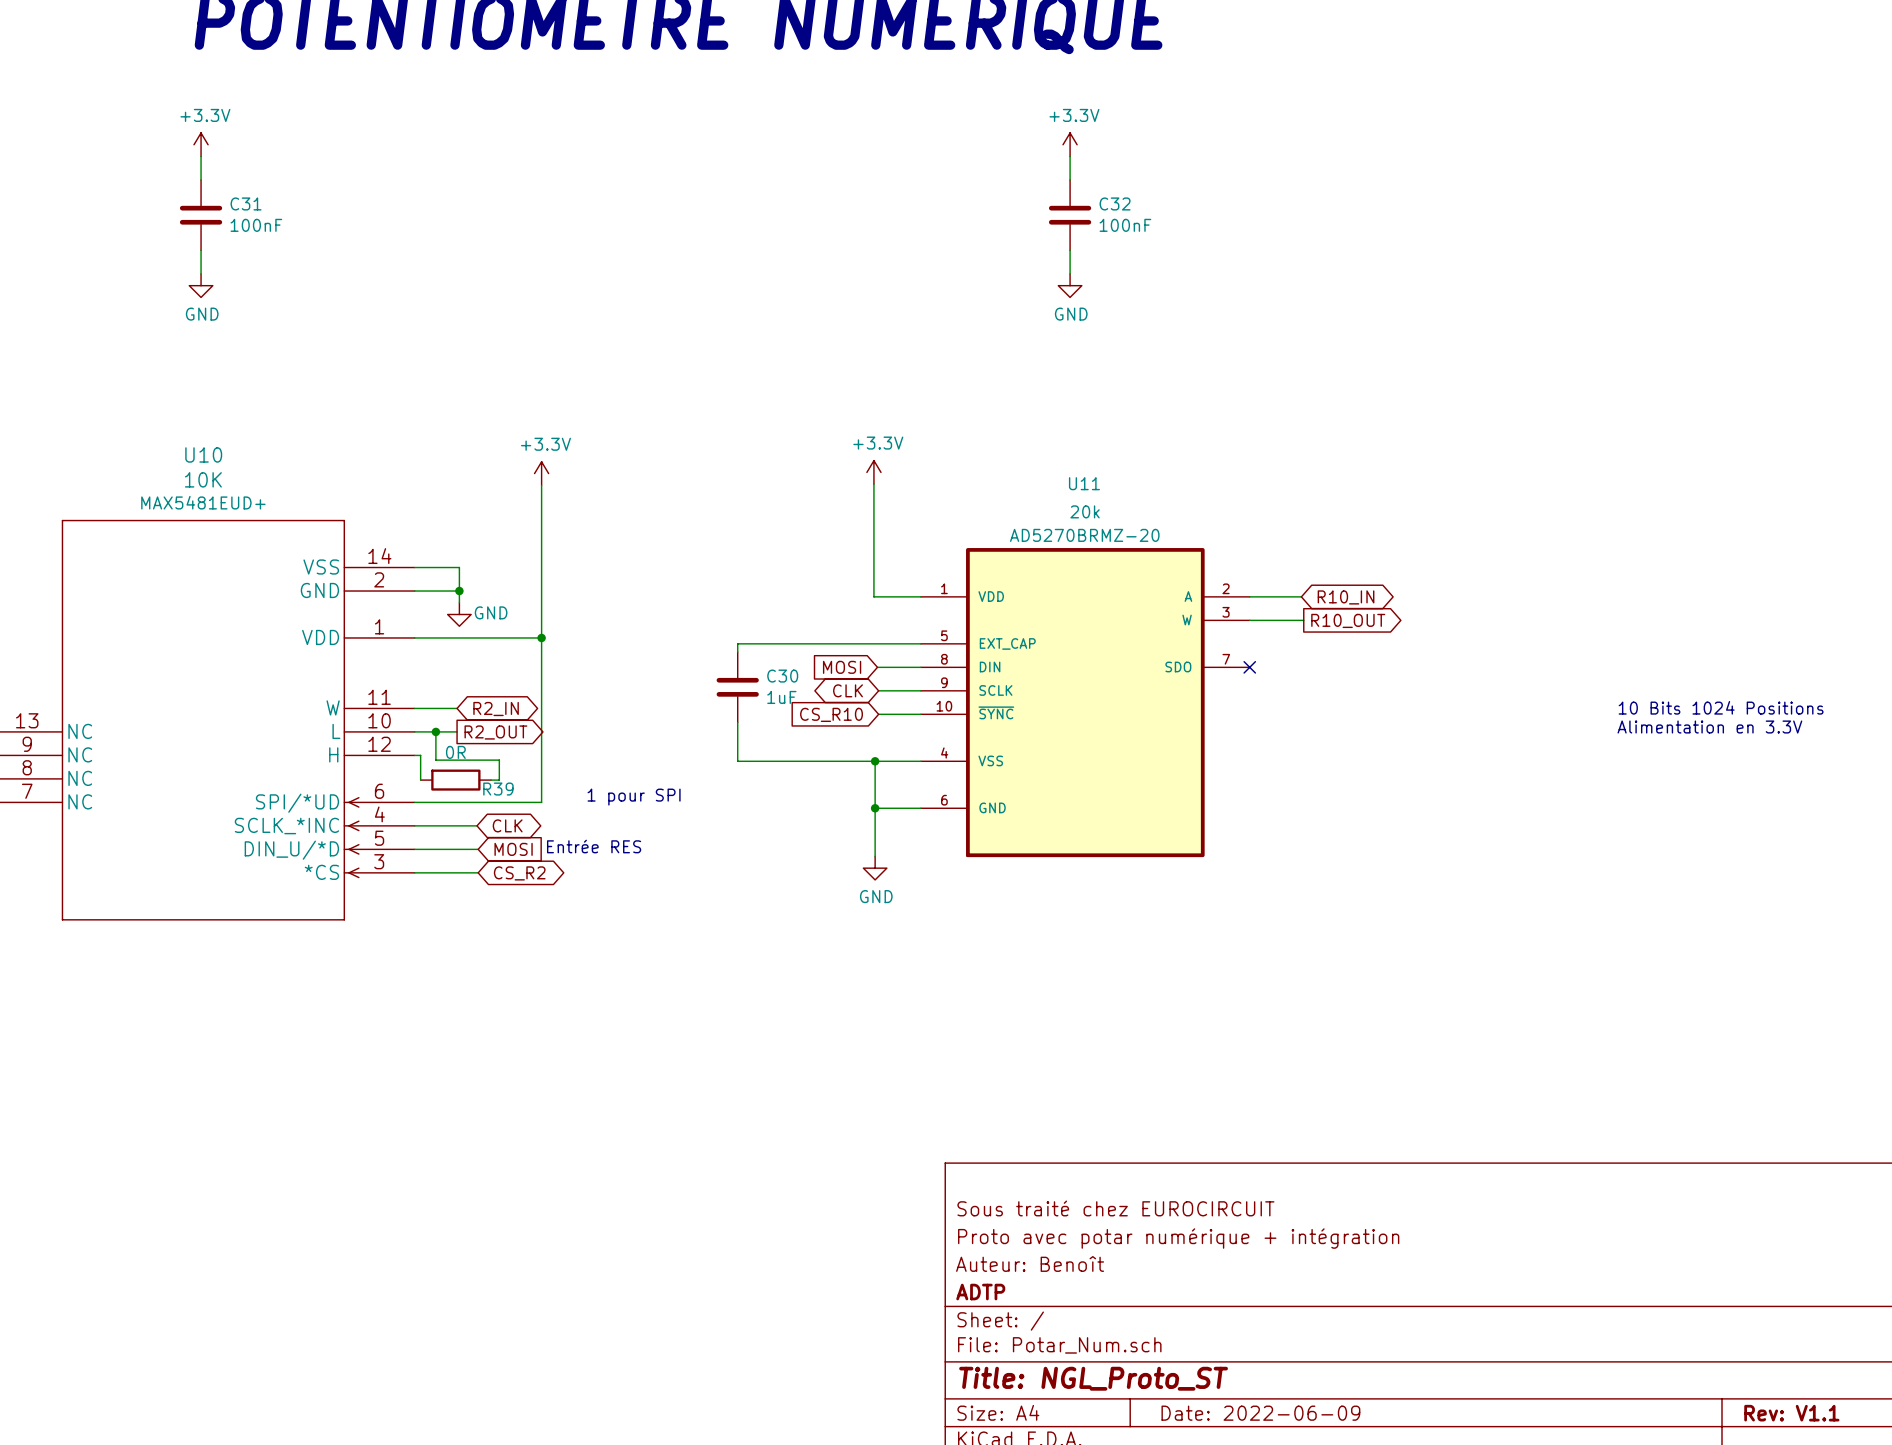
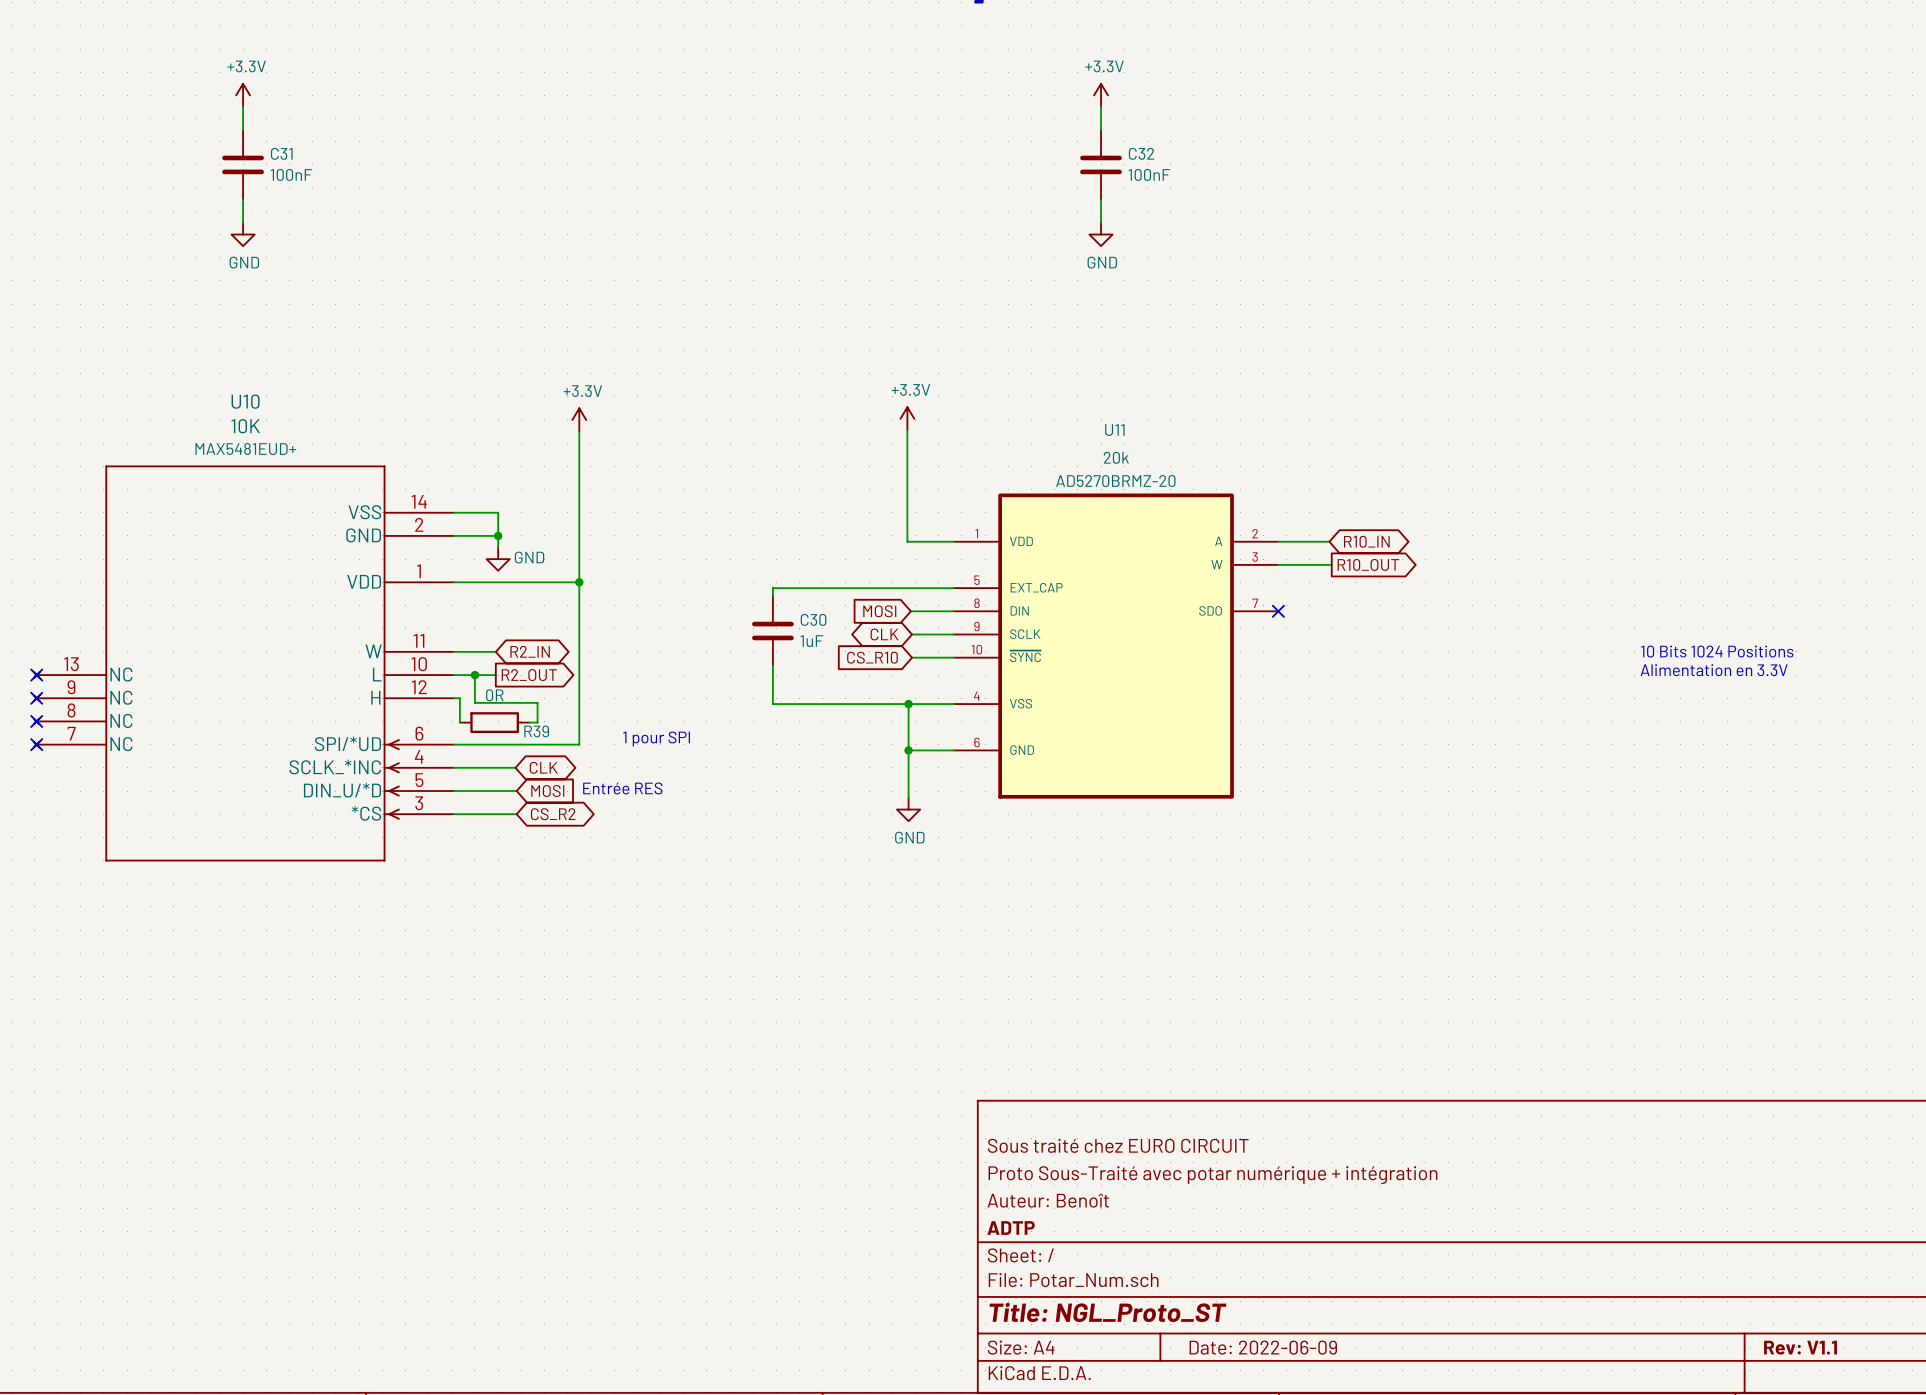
title block: Sous traité chez EUROCIRCUIT (1115, 1208) -> Sous traité chez EURO CIRCUIT (1118, 1145)
title block: Proto avec potar numérique + intégration (1178, 1238) -> Proto Sous-Traité avec potar numérique + intégration (1212, 1175)

